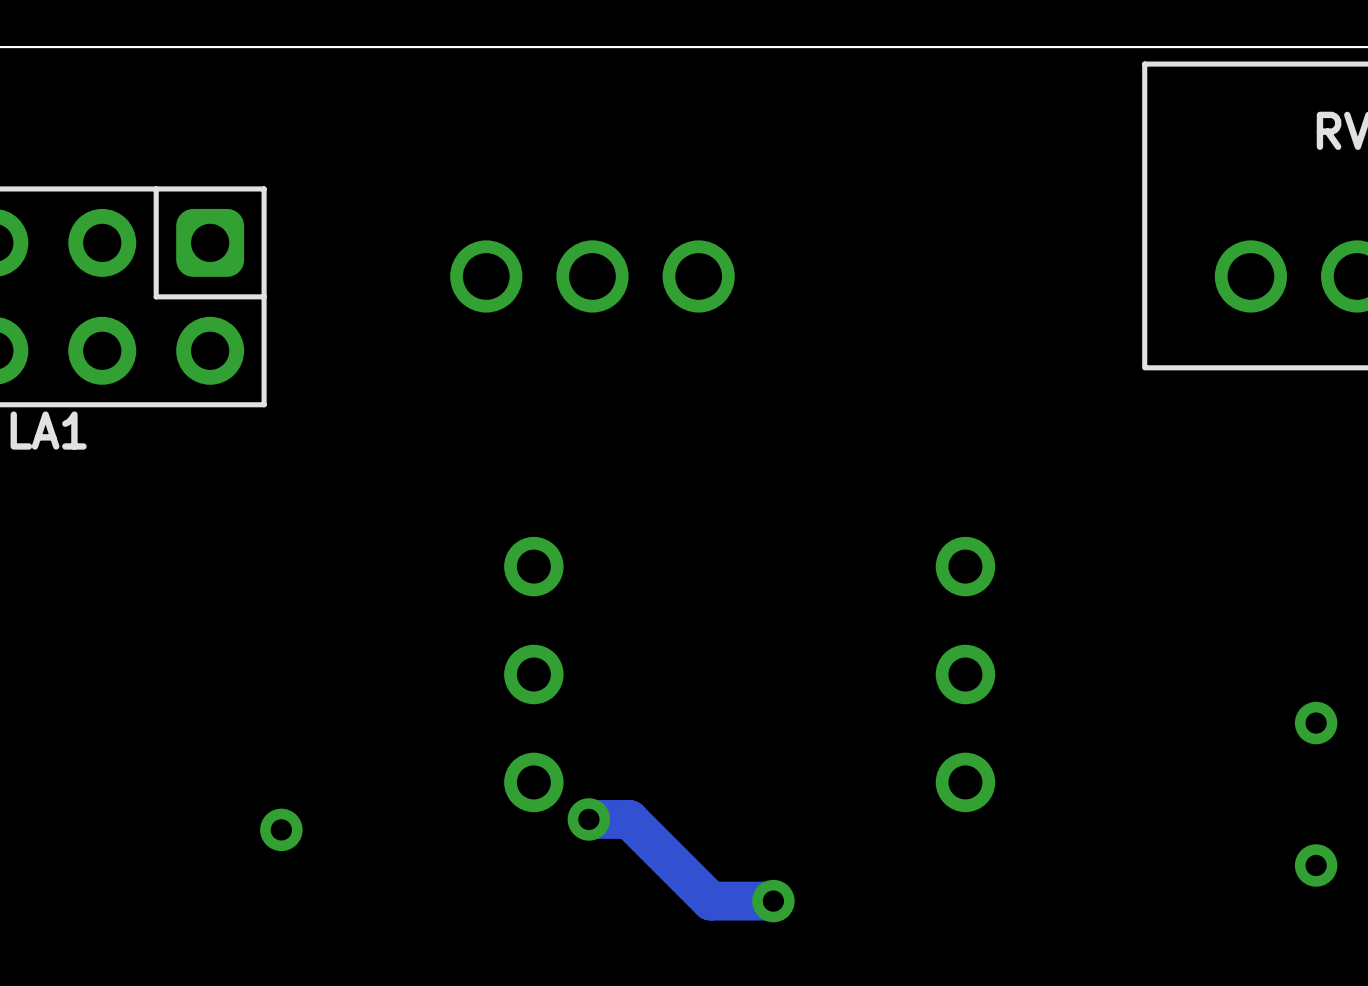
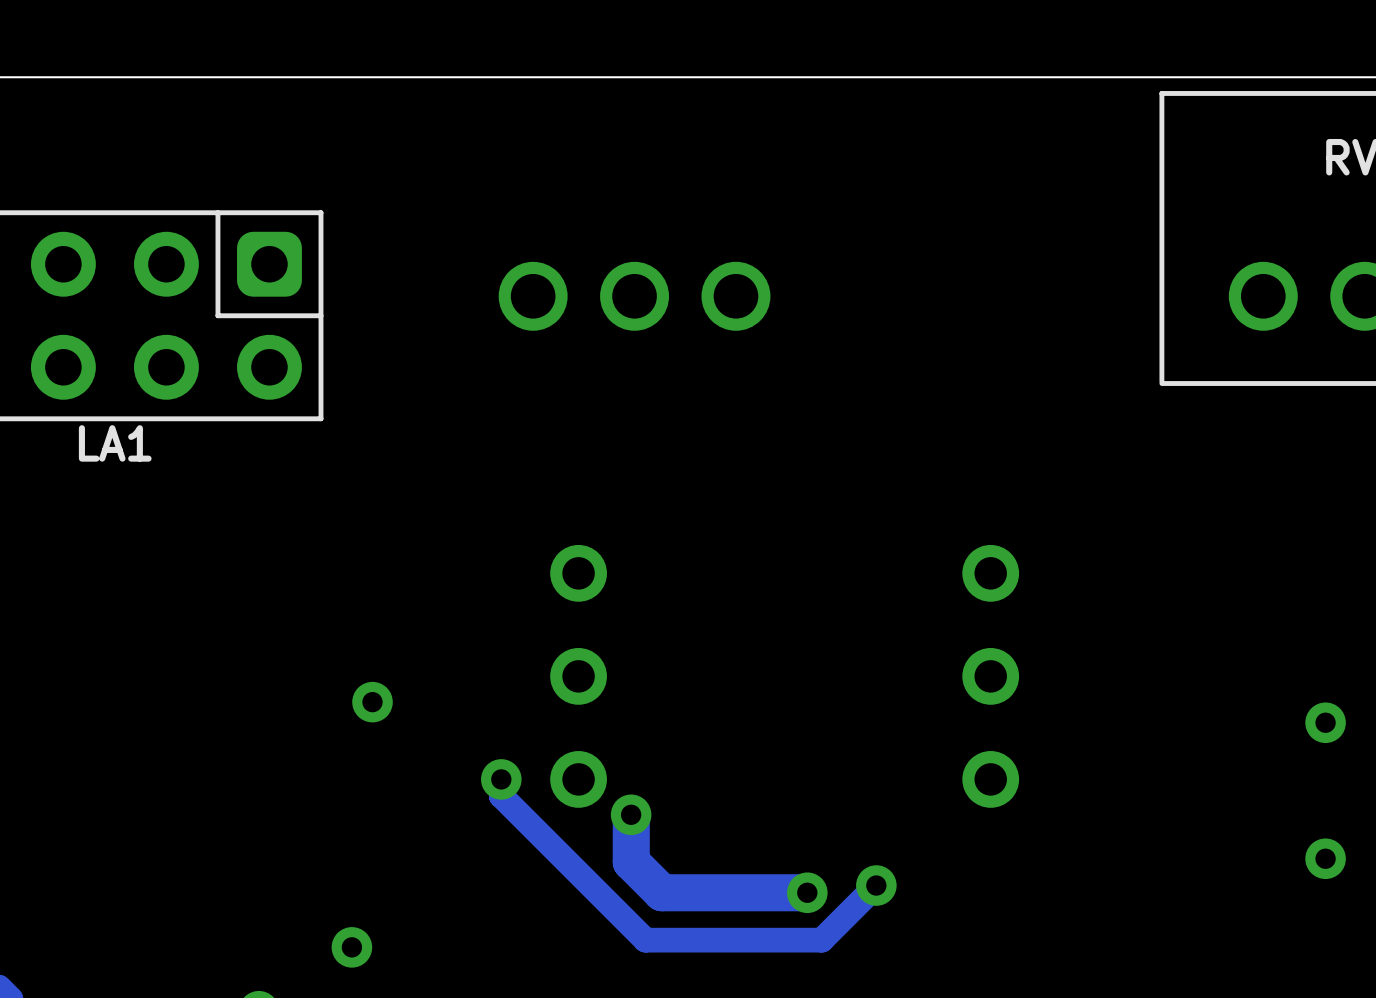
via: none -> (372, 702)
track: none -> (501, 779) (501, 795) (645, 940) (821, 940) (876, 885)
via: none -> (501, 779)
track: (588, 819) (629, 819) (710, 901) -> (631, 813) (631, 861) (662, 892) (747, 892)
via: (281, 829) -> none
via: none -> (876, 885)
via: none -> (351, 947)

